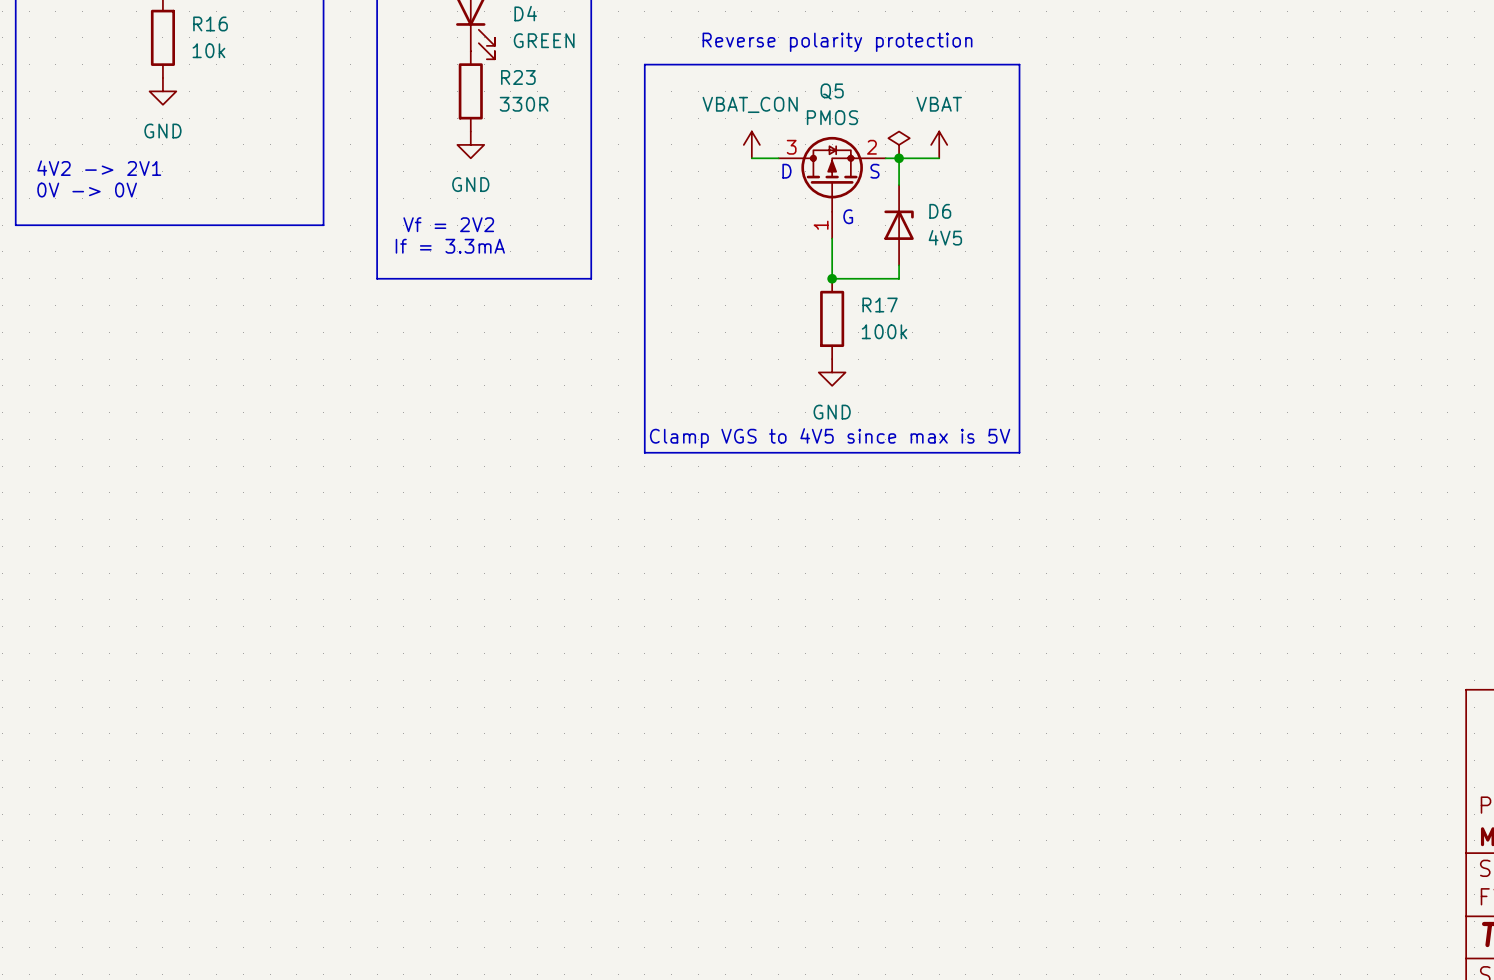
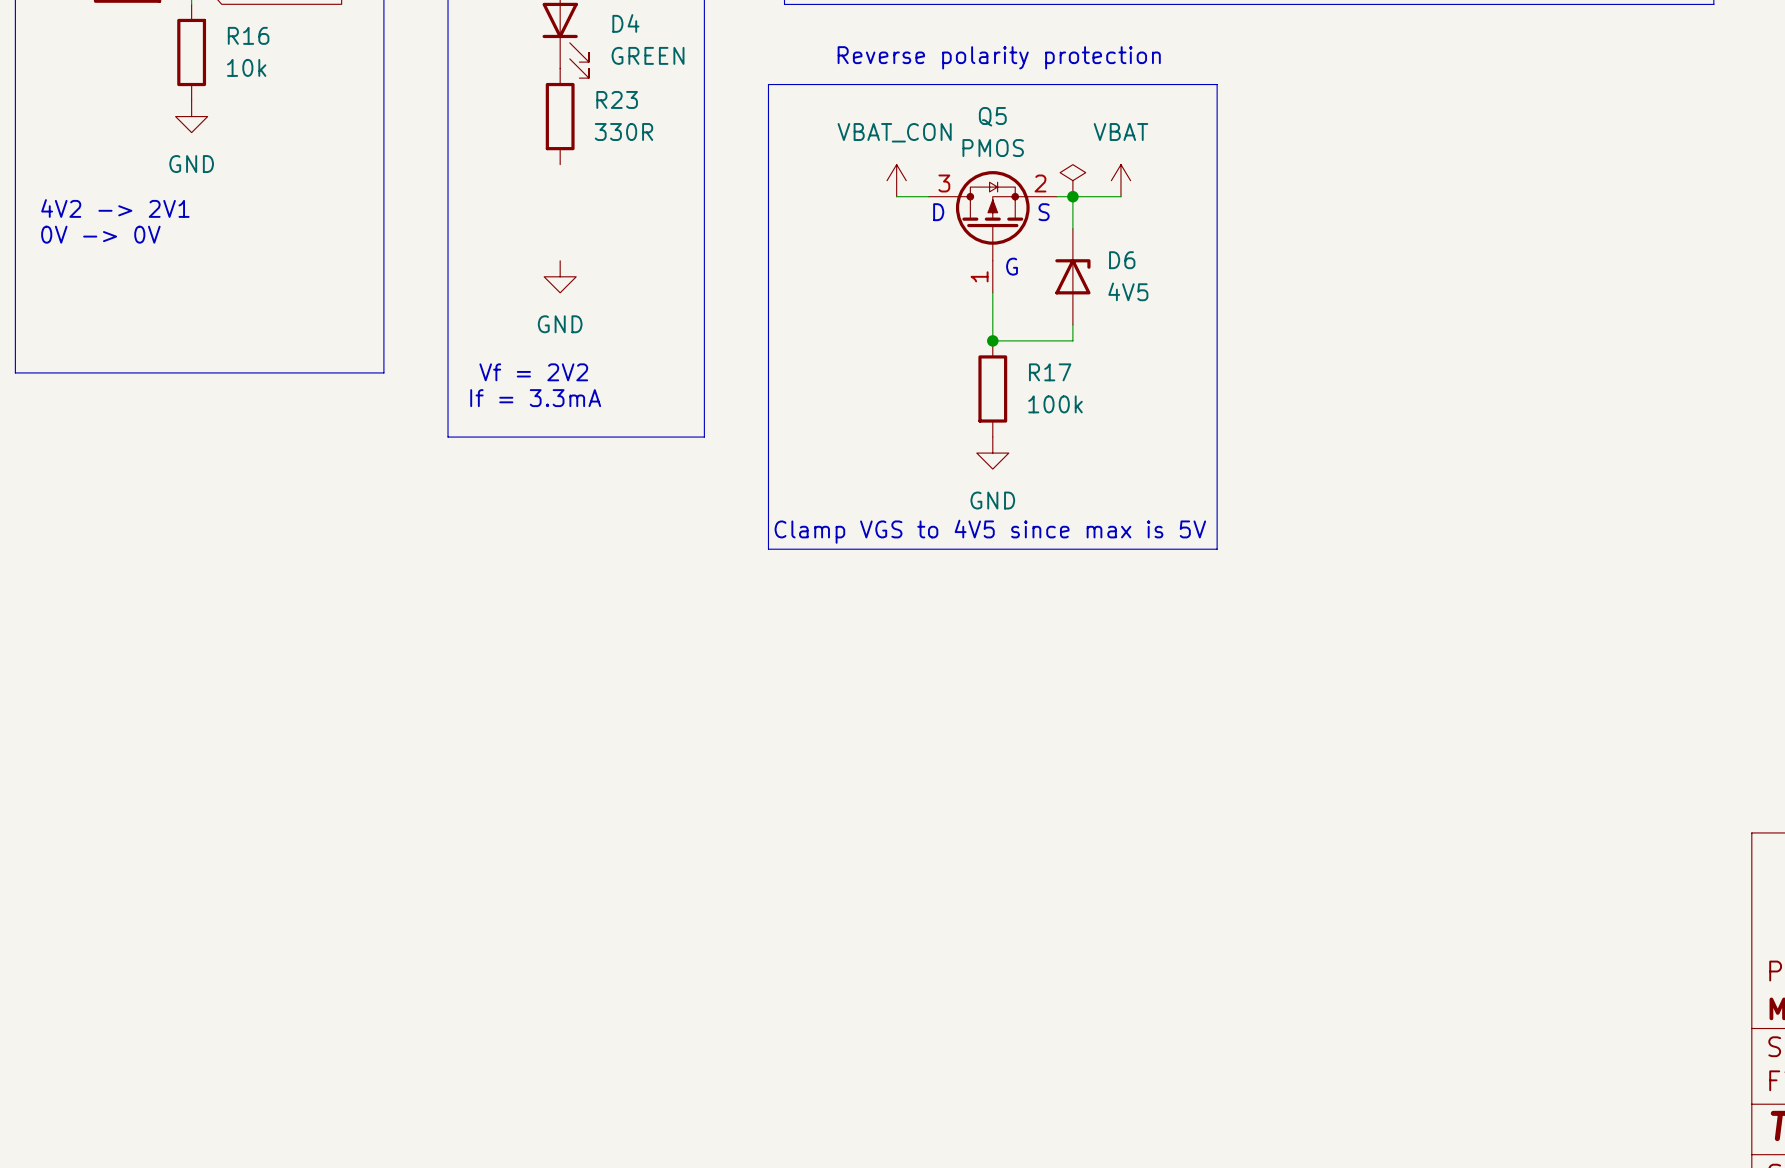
power symbol position: GND (470, 144) -> GND (560, 276)
text position: Vf = 2V2 (448, 224) -> Vf = 2V2 (533, 372)
line: (15, 225) (323, 225) -> (15, 276) (15, 372) (383, 372) (383, 276)
text position: If = 3.3mA (450, 246) -> If = 3.3mA (535, 398)
line: (377, 278) (591, 278) -> (448, 340) (448, 437) (704, 437) (704, 340)

